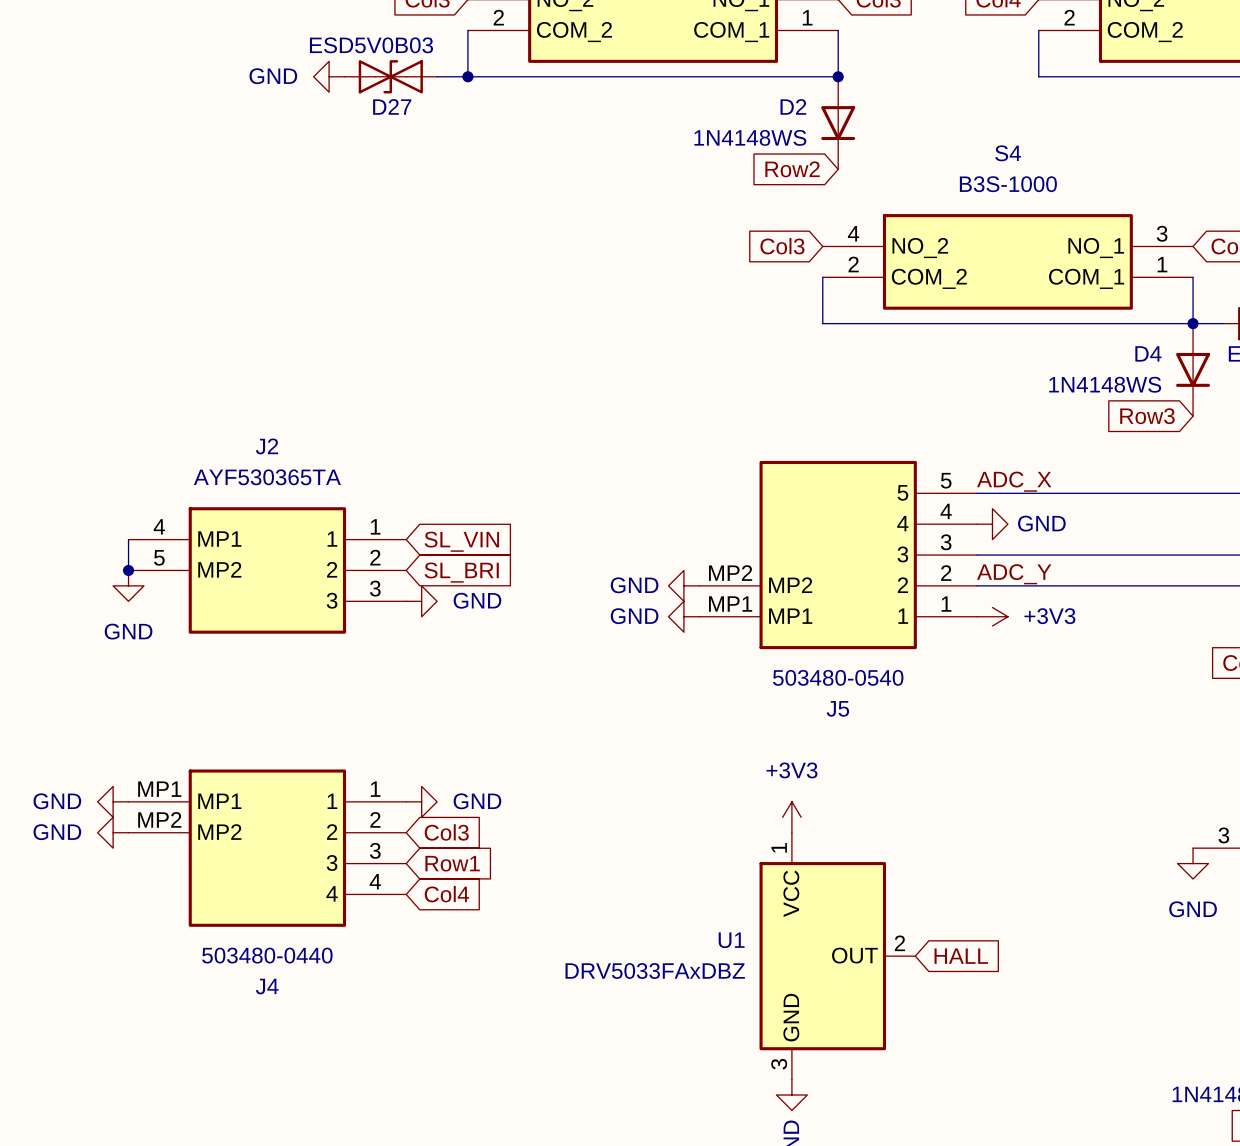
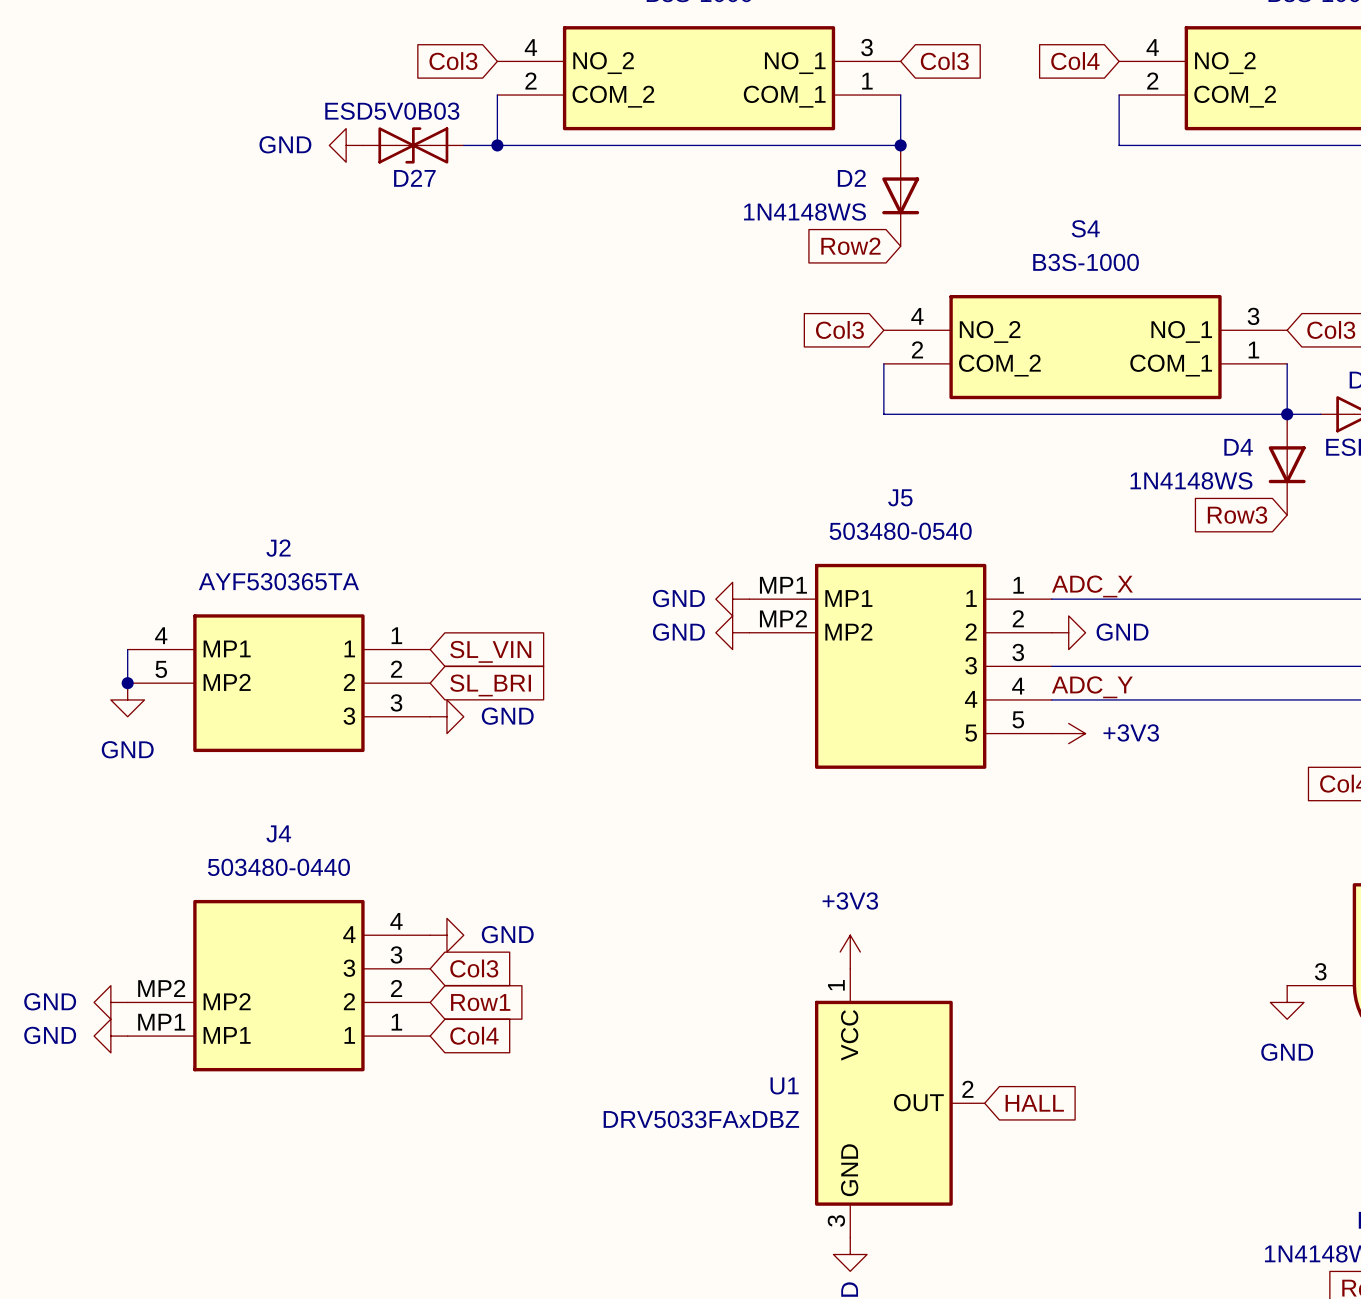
power symbol: none -> GND (732, 599)
power symbol: none -> GND (732, 632)
J5 flip: as is (838, 555) -> up-down (900, 666)
power symbol: GND (683, 585) -> none
power symbol: GND (683, 616) -> none
power symbol: GND (113, 801) -> none
power symbol: GND (113, 832) -> none
J4 flip: as is (267, 848) -> up-down (278, 985)
power symbol: none -> GND (110, 1002)
power symbol: none -> GND (110, 1036)

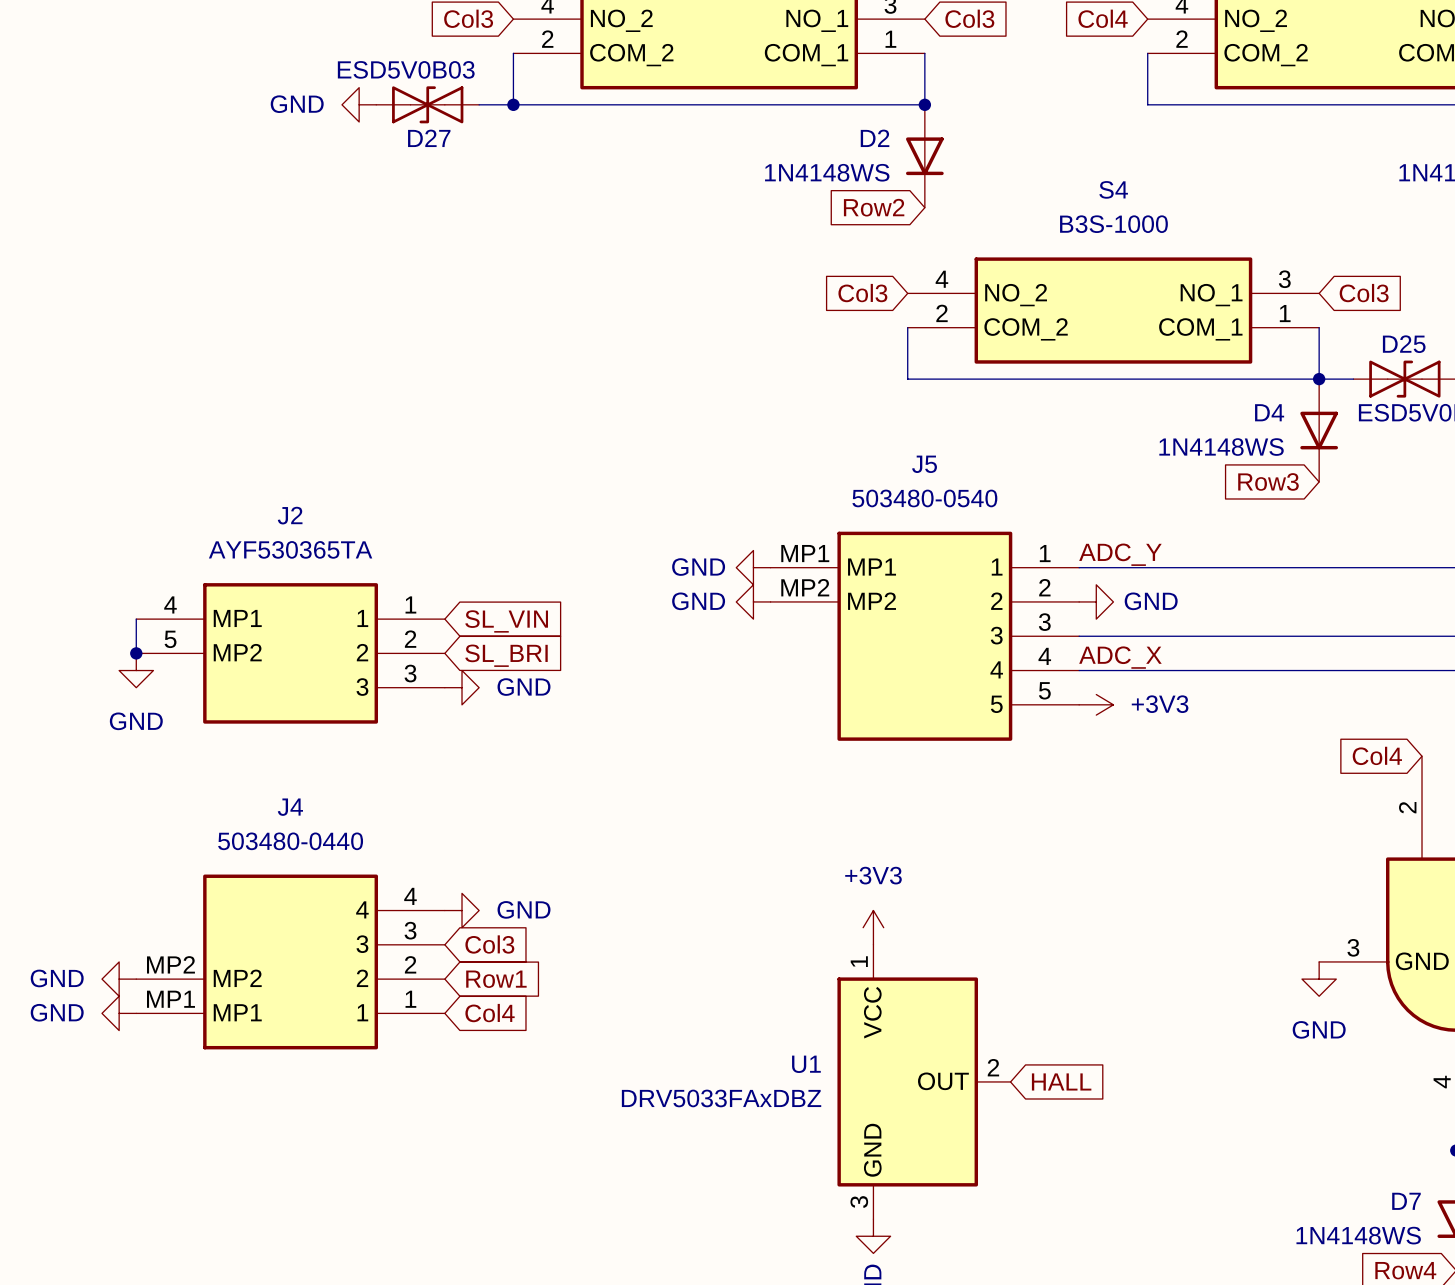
label: ADC_X (1092, 586) -> ADC_Y (1120, 554)
label: ADC_Y (1092, 687) -> ADC_X (1120, 657)

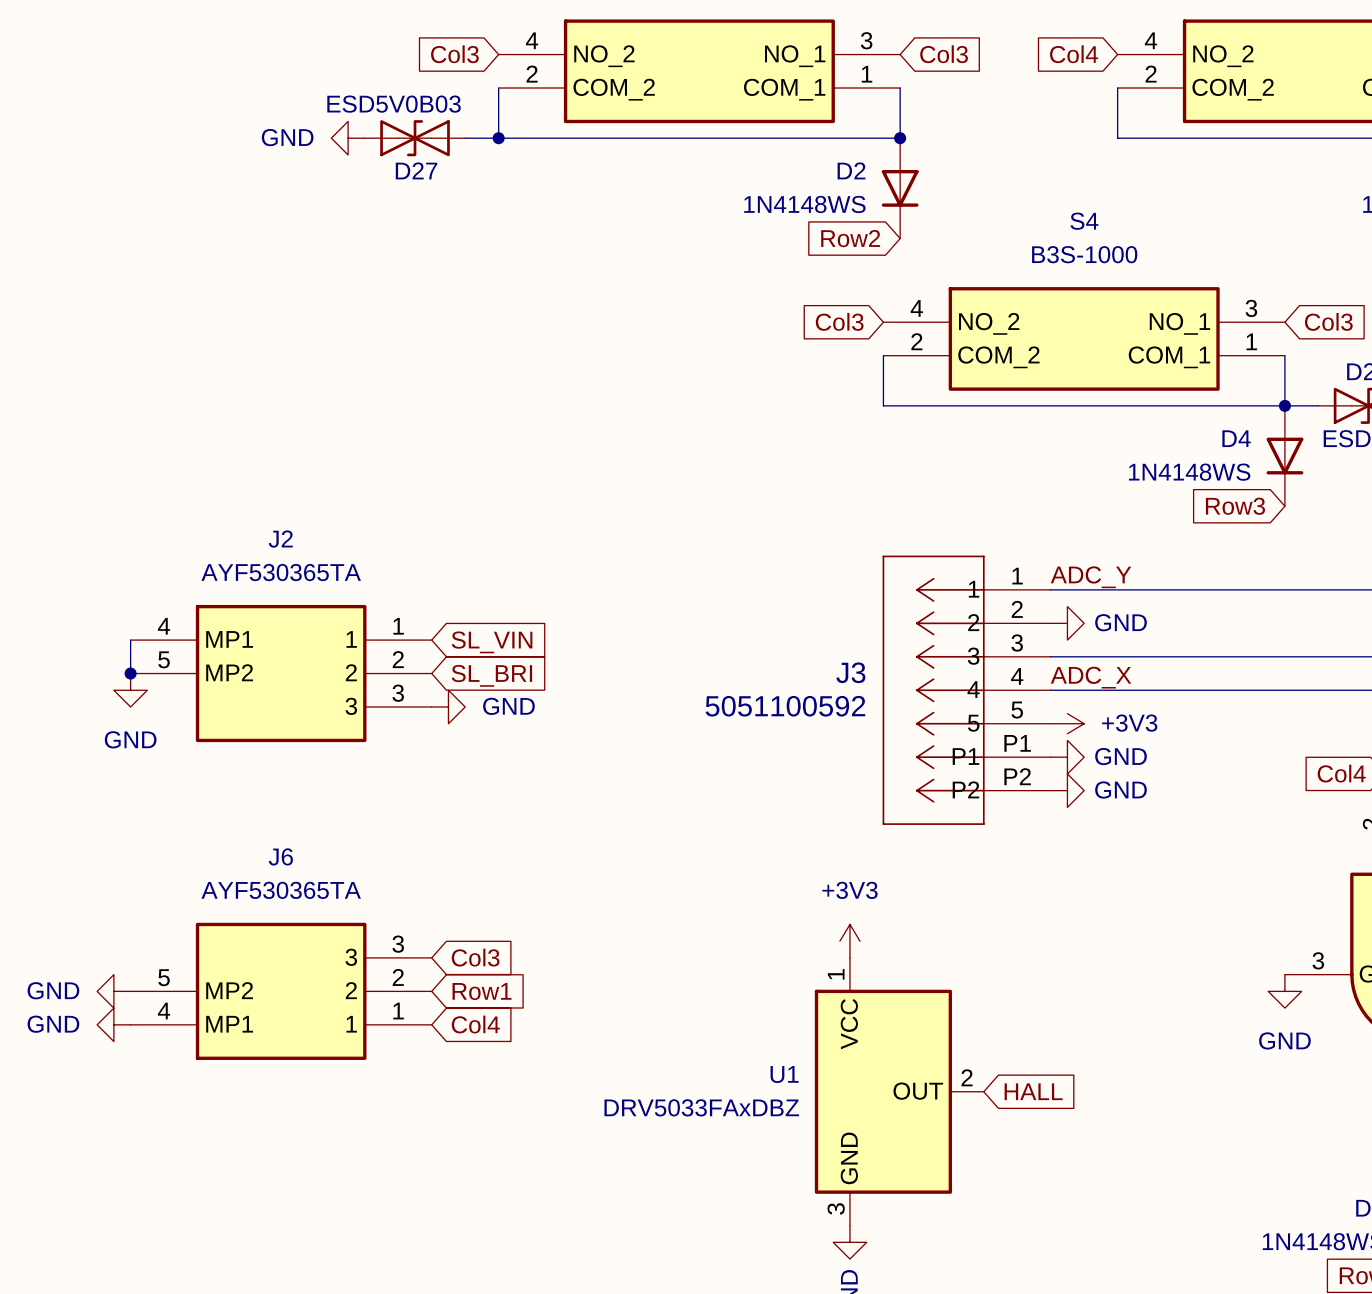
power symbol: GND (753, 567) -> none
power symbol: GND (753, 601) -> none
J5: 503480-0540 (924, 636) -> none
J3: none -> 5051100592 (966, 690)
power symbol: none -> GND (1067, 757)
power symbol: none -> GND (1067, 790)
power symbol: GND (462, 910) -> none
J4: 503480-0440 (290, 961) -> none
J6: none -> AYF530365TA (281, 991)

